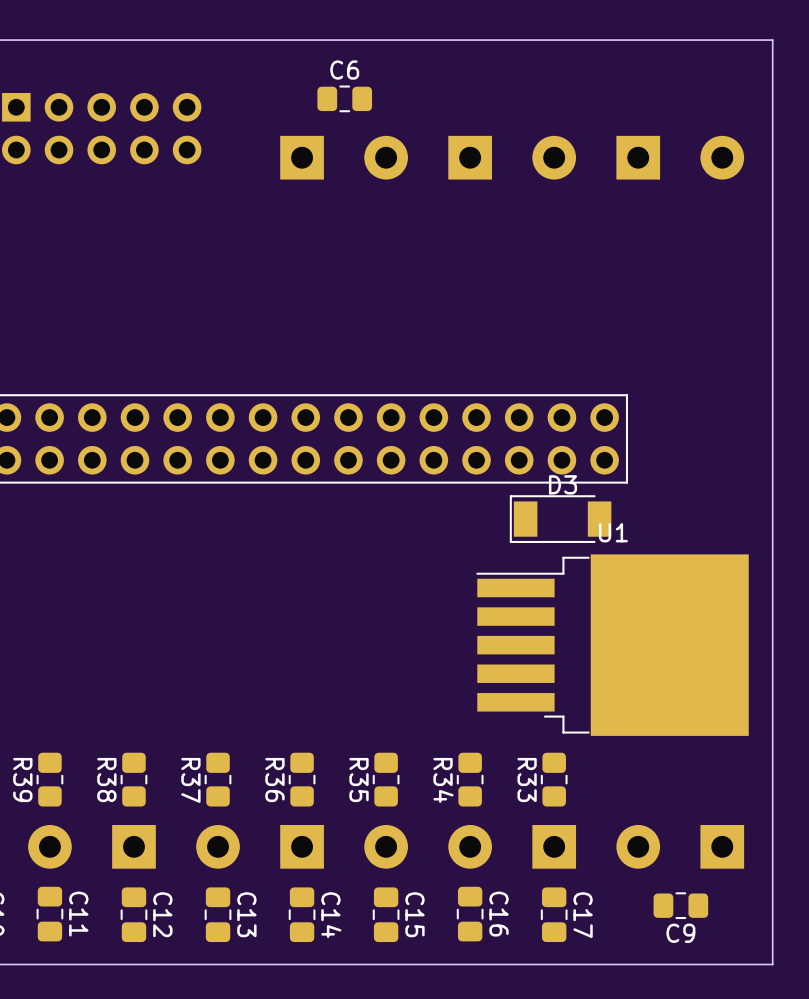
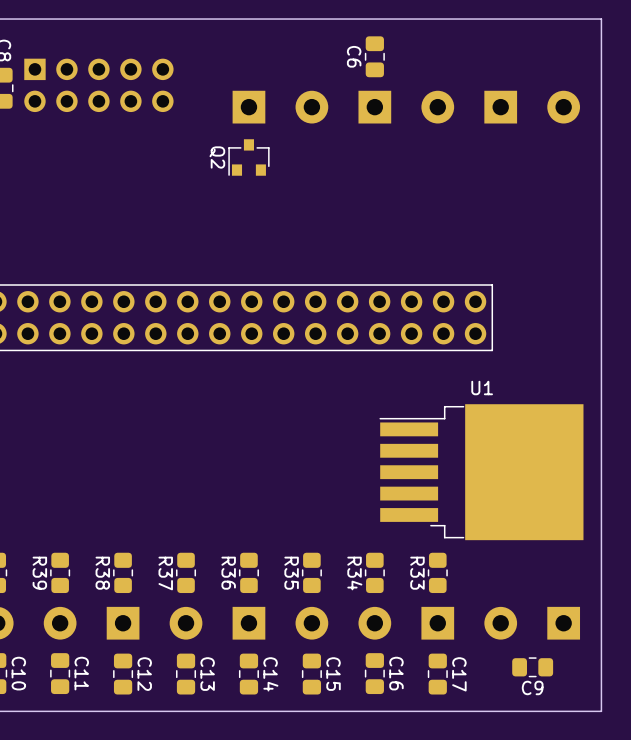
C6 name position: C6 (344, 70) -> C6 (354, 56)
C6 rotation: 0° (344, 98) -> 90° clockwise (374, 56)
C6 position: (344, 98) -> (374, 56)
Q2: none -> (248, 157)
D3: (560, 519) -> none

